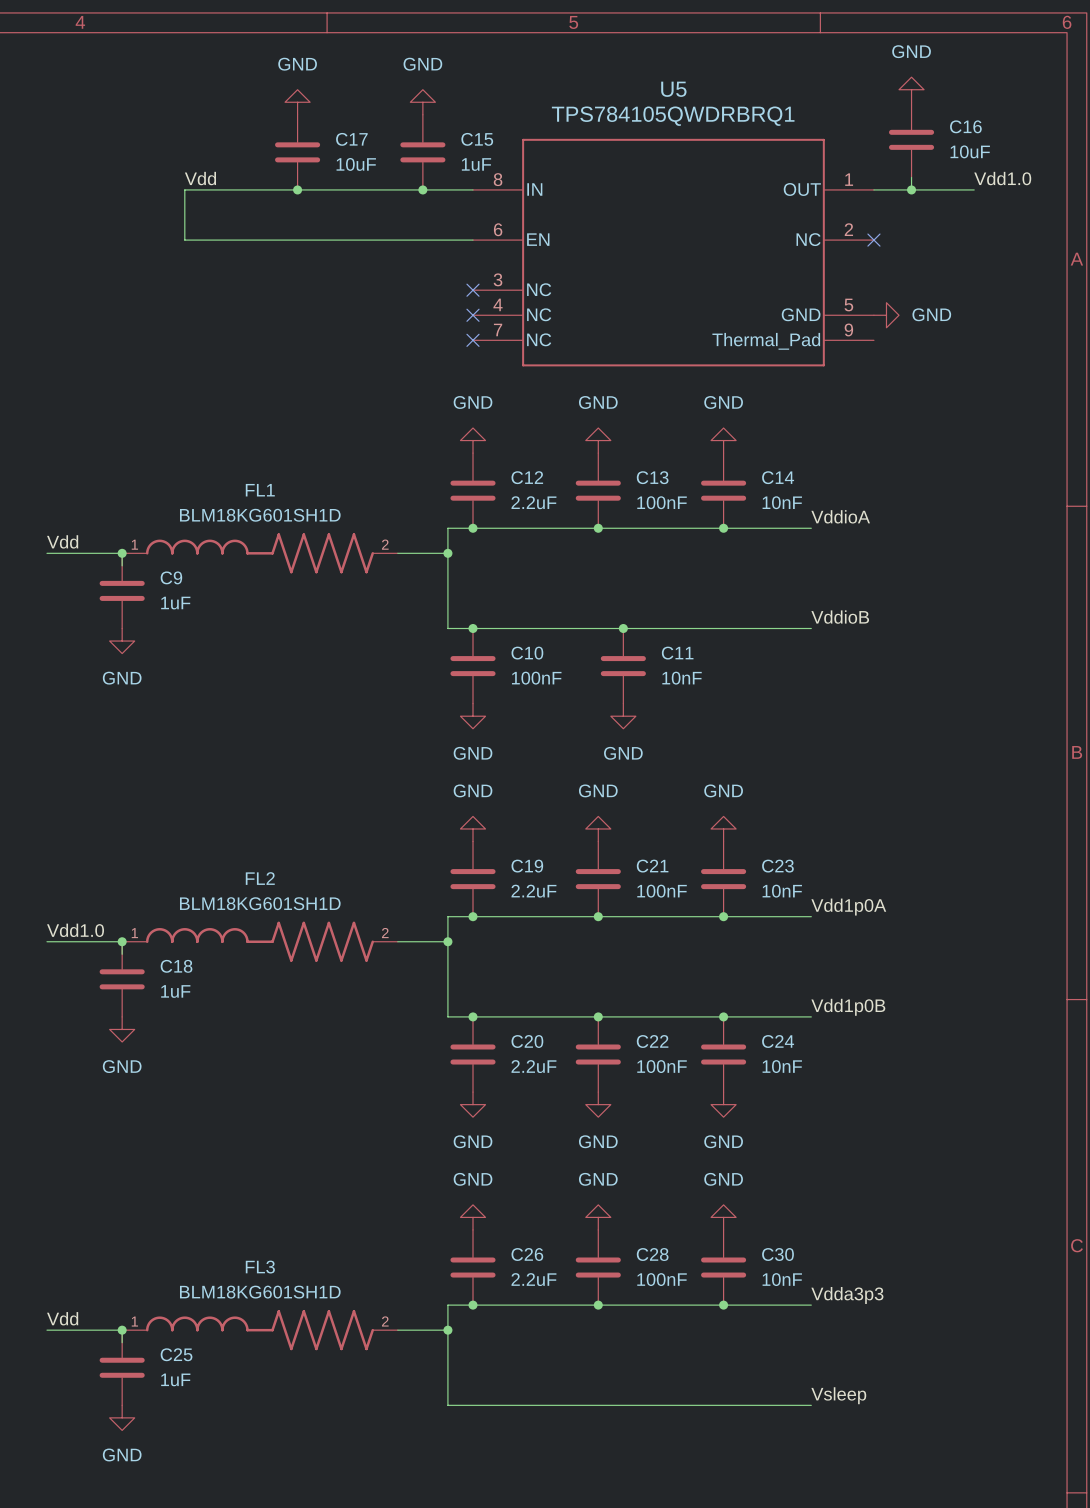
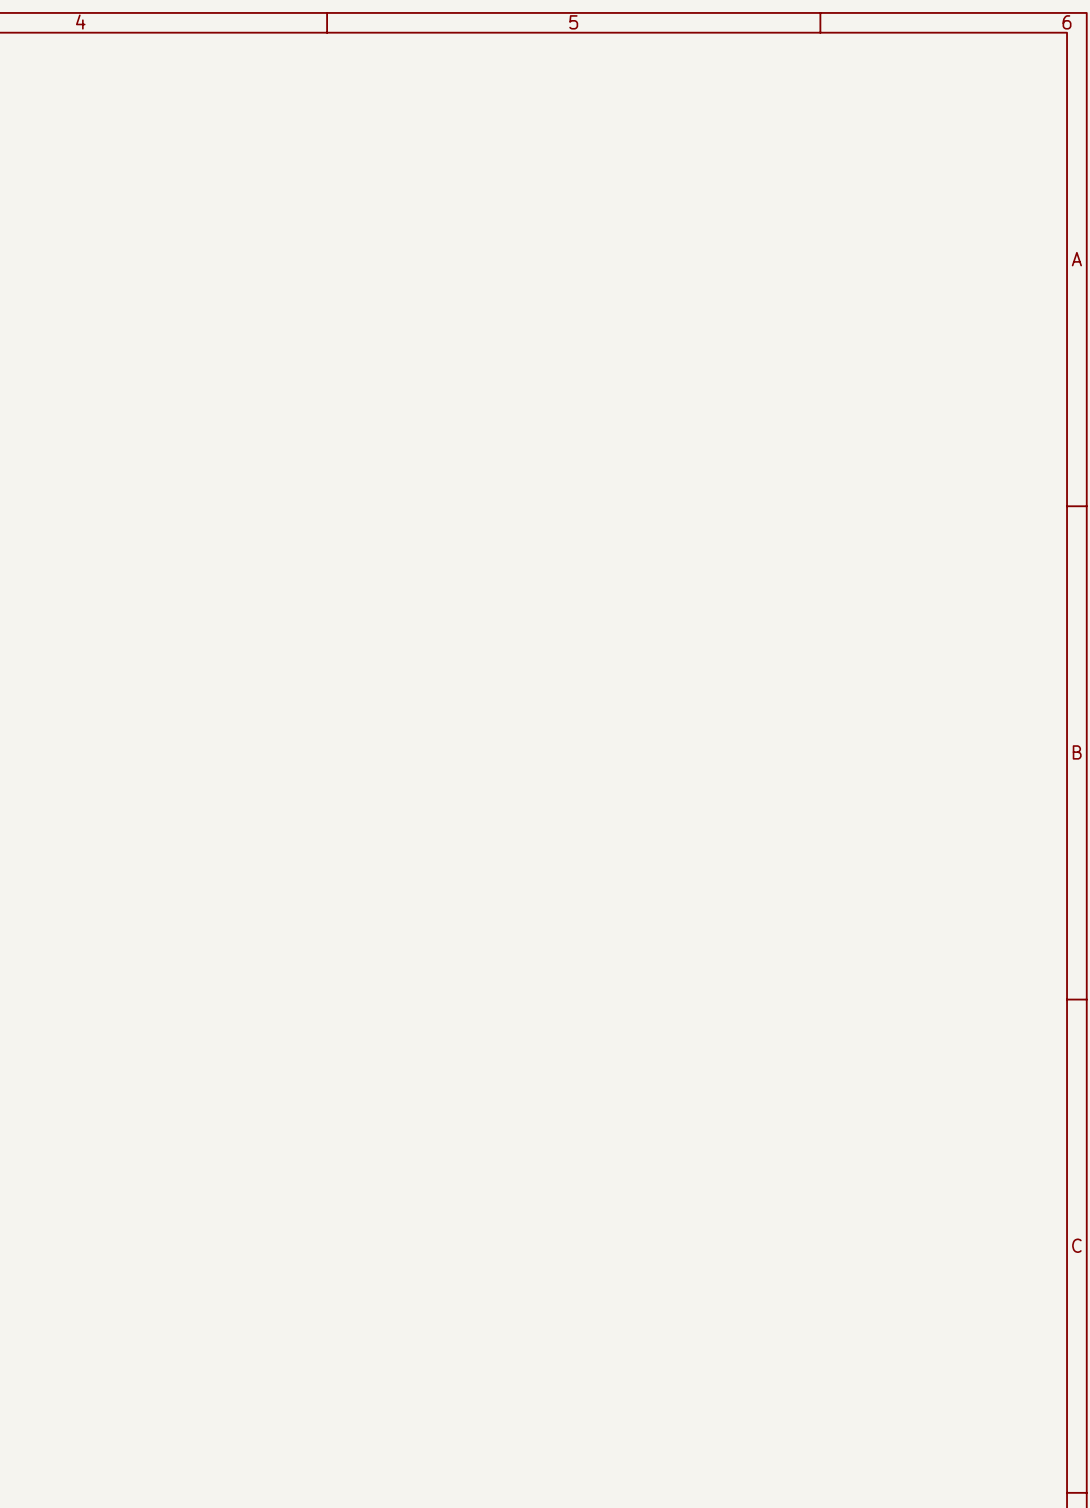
power symbol: GND (911, 89) -> none
power symbol: GND (297, 102) -> none
power symbol: GND (422, 102) -> none
C16: 10uF (911, 139) -> none
C17: 10uF (297, 152) -> none
C15: 1uF (422, 152) -> none
wire: (911, 177) (911, 189) -> none
label: Vdd (200, 178) -> none
label: Vdd1.0 (1002, 178) -> none
junction: (297, 189) -> none
junction: (422, 189) -> none
wire: (472, 189) (184, 189) (184, 240) (472, 240) -> none
wire: (873, 189) (974, 189) -> none
junction: (911, 189) -> none
no-connect mark: (873, 240) -> none
U5: TPS784105QWDRBRQ1 (673, 252) -> none
no-connect mark: (472, 290) -> none
no-connect mark: (472, 315) -> none
power symbol: GND (886, 315) -> none
no-connect mark: (472, 340) -> none
power symbol: GND (472, 440) -> none
power symbol: GND (598, 440) -> none
power symbol: GND (723, 440) -> none
C12: 2.2uF (472, 490) -> none
C13: 100nF (598, 490) -> none
C14: 10nF (723, 490) -> none
label: VddioA (840, 516) -> none
junction: (472, 528) -> none
junction: (598, 528) -> none
junction: (723, 528) -> none
wire: (811, 528) (447, 528) (447, 628) (811, 628) -> none
label: Vdd (62, 541) -> none
wire: (46, 553) (122, 553) (122, 565) -> none
junction: (122, 553) -> none
FL1: BLM18KG601SH1D (259, 553) -> none
wire: (397, 553) (447, 553) -> none
junction: (447, 553) -> none
C9: 1uF (122, 590) -> none
label: VddioB (840, 617) -> none
junction: (472, 628) -> none
junction: (623, 628) -> none
power symbol: GND (122, 641) -> none
C10: 100nF (472, 666) -> none
C11: 10nF (623, 666) -> none
power symbol: GND (472, 716) -> none
power symbol: GND (623, 716) -> none
power symbol: GND (472, 828) -> none
power symbol: GND (598, 828) -> none
power symbol: GND (723, 828) -> none
C19: 2.2uF (472, 879) -> none
C21: 100nF (598, 879) -> none
C23: 10nF (723, 879) -> none
label: Vdd1p0A (848, 907) -> none
junction: (472, 916) -> none
junction: (598, 916) -> none
junction: (723, 916) -> none
wire: (811, 916) (447, 916) (447, 1016) (811, 1016) -> none
label: Vdd1.0 (75, 930) -> none
wire: (46, 941) (122, 941) (122, 954) -> none
junction: (122, 941) -> none
FL2: BLM18KG601SH1D (259, 941) -> none
wire: (397, 941) (447, 941) -> none
junction: (447, 941) -> none
C18: 1uF (122, 979) -> none
label: Vdd1p0B (848, 1007) -> none
junction: (472, 1016) -> none
junction: (598, 1016) -> none
junction: (723, 1016) -> none
power symbol: GND (122, 1029) -> none
C20: 2.2uF (472, 1054) -> none
C22: 100nF (598, 1054) -> none
C24: 10nF (723, 1054) -> none
power symbol: GND (472, 1104) -> none
power symbol: GND (598, 1104) -> none
power symbol: GND (723, 1104) -> none
power symbol: GND (472, 1217) -> none
power symbol: GND (598, 1217) -> none
power symbol: GND (723, 1217) -> none
C26: 2.2uF (472, 1267) -> none
C28: 100nF (598, 1267) -> none
C30: 10nF (723, 1267) -> none
label: Vdda3p3 (847, 1295) -> none
junction: (472, 1305) -> none
junction: (598, 1305) -> none
junction: (723, 1305) -> none
wire: (811, 1305) (447, 1305) (447, 1405) (811, 1405) -> none
label: Vdd (62, 1318) -> none
wire: (46, 1330) (122, 1330) (122, 1342) -> none
junction: (122, 1330) -> none
FL3: BLM18KG601SH1D (259, 1330) -> none
wire: (397, 1330) (447, 1330) -> none
junction: (447, 1330) -> none
C25: 1uF (122, 1367) -> none
label: Vsleep (838, 1395) -> none
power symbol: GND (122, 1417) -> none

